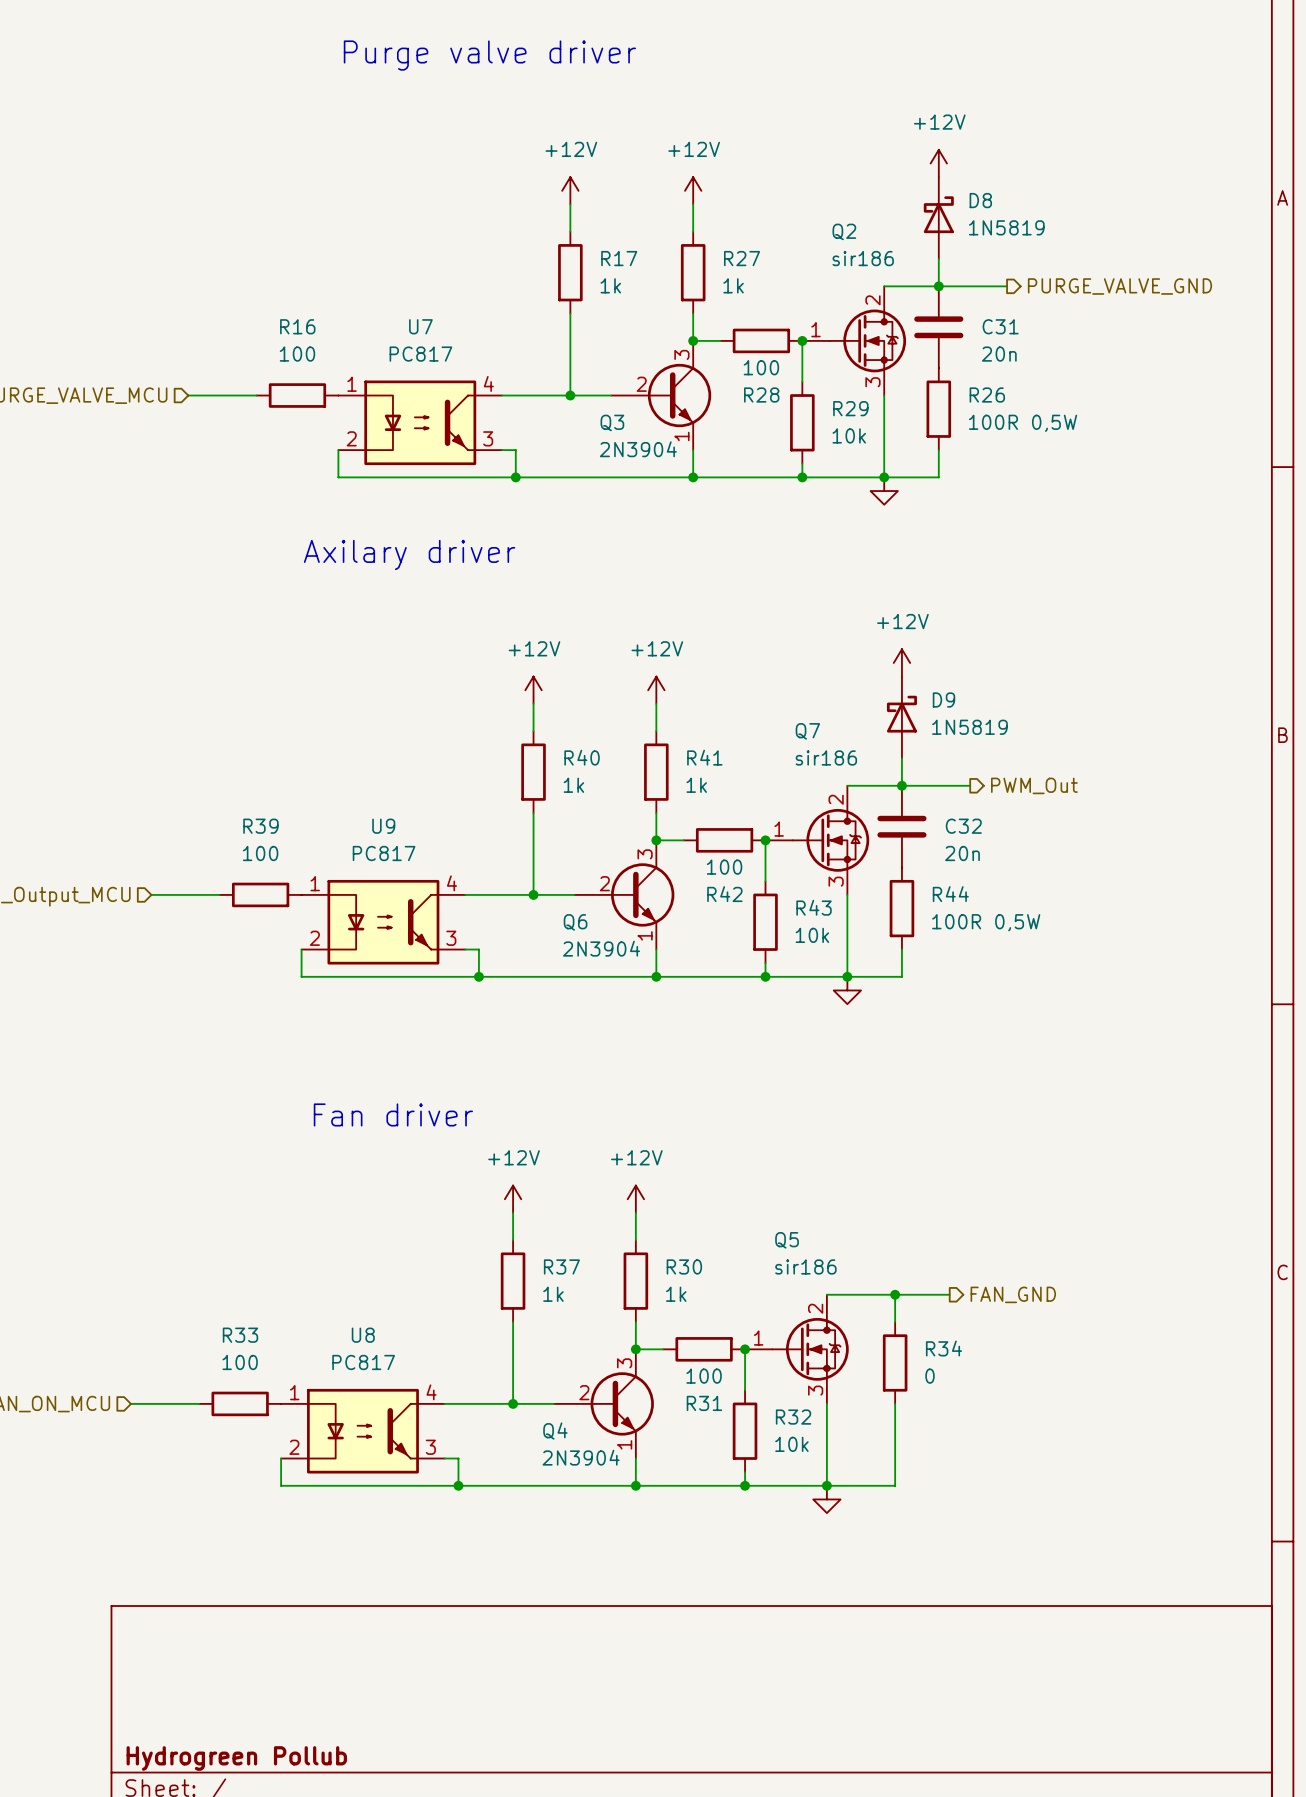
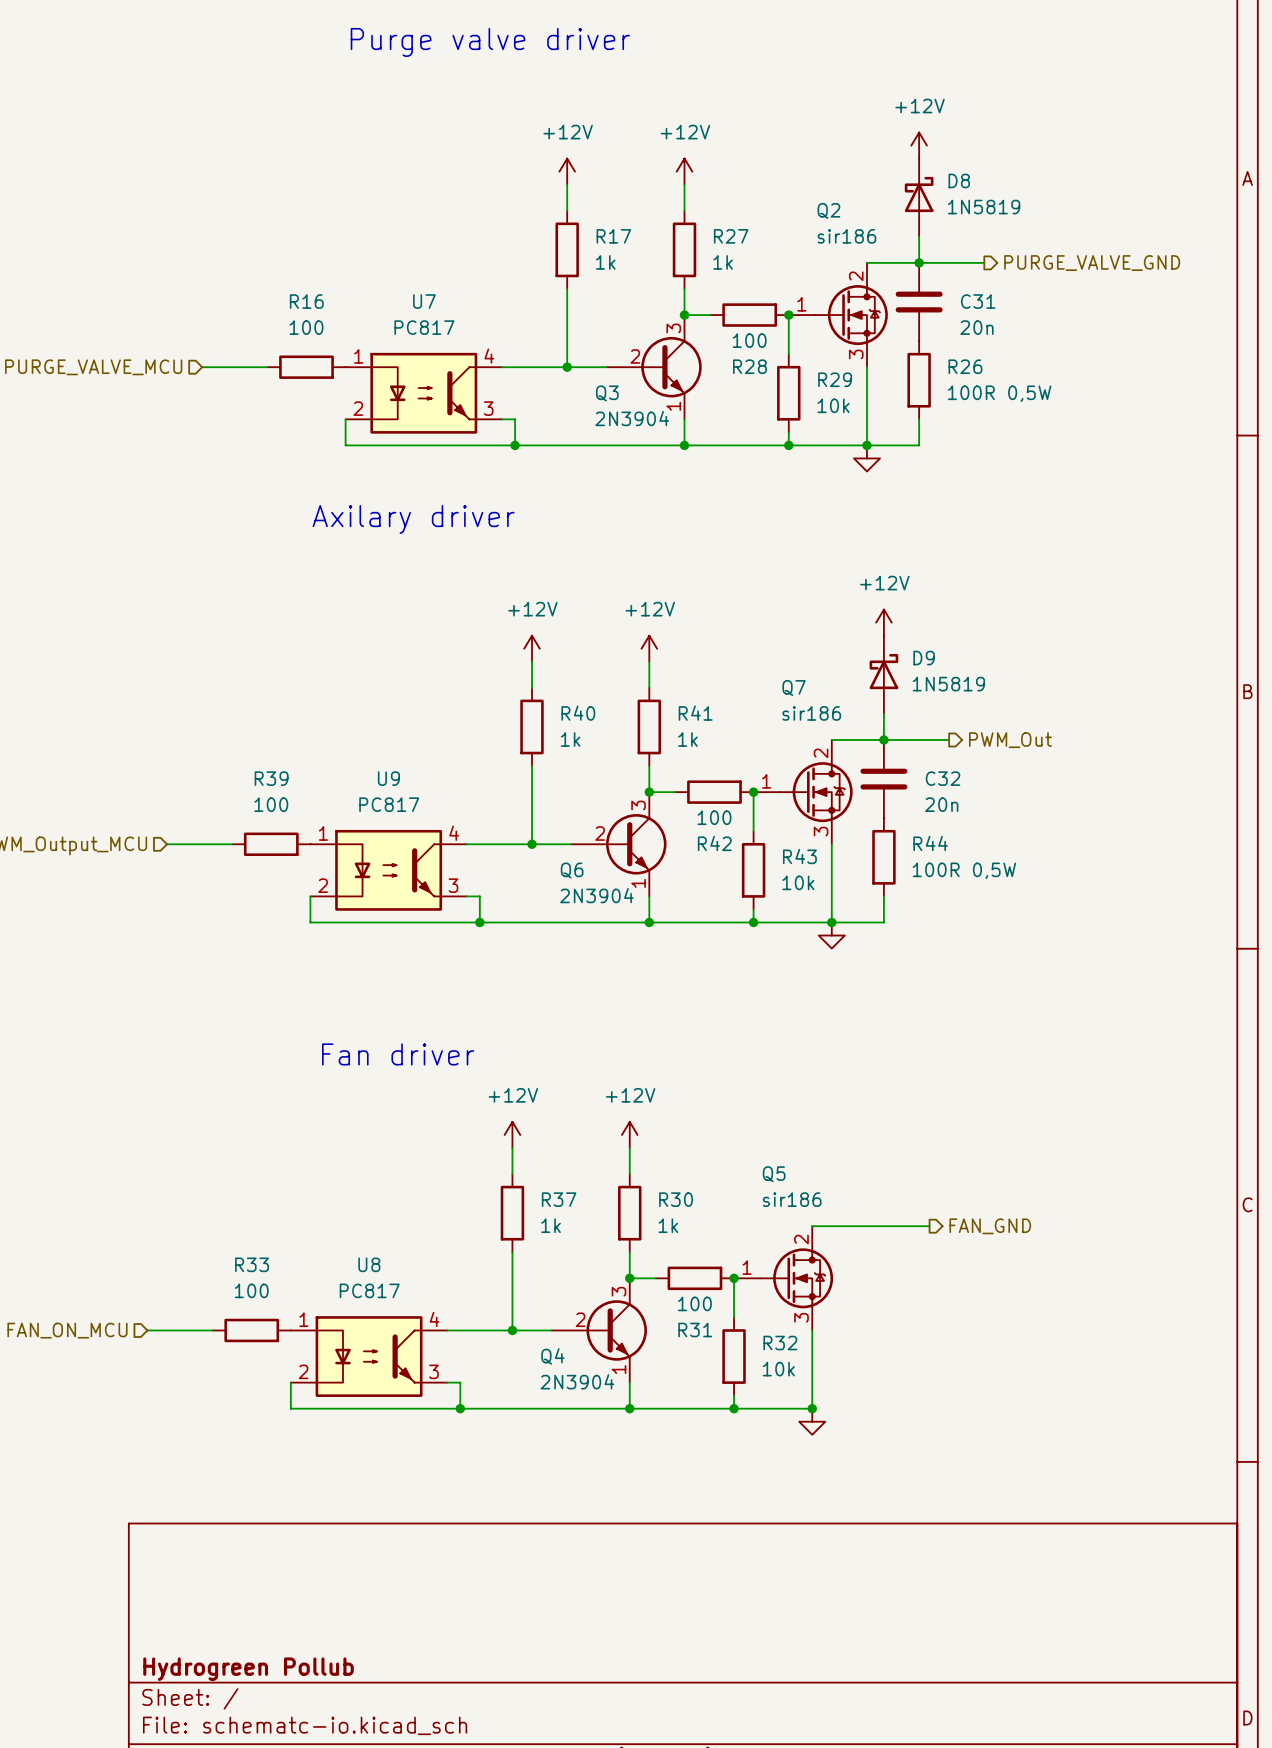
wire: (895, 1294) (895, 1322) -> none
junction: (895, 1294) -> none
R34: 0 (895, 1362) -> none
wire: (895, 1403) (895, 1485) (826, 1485) -> none

